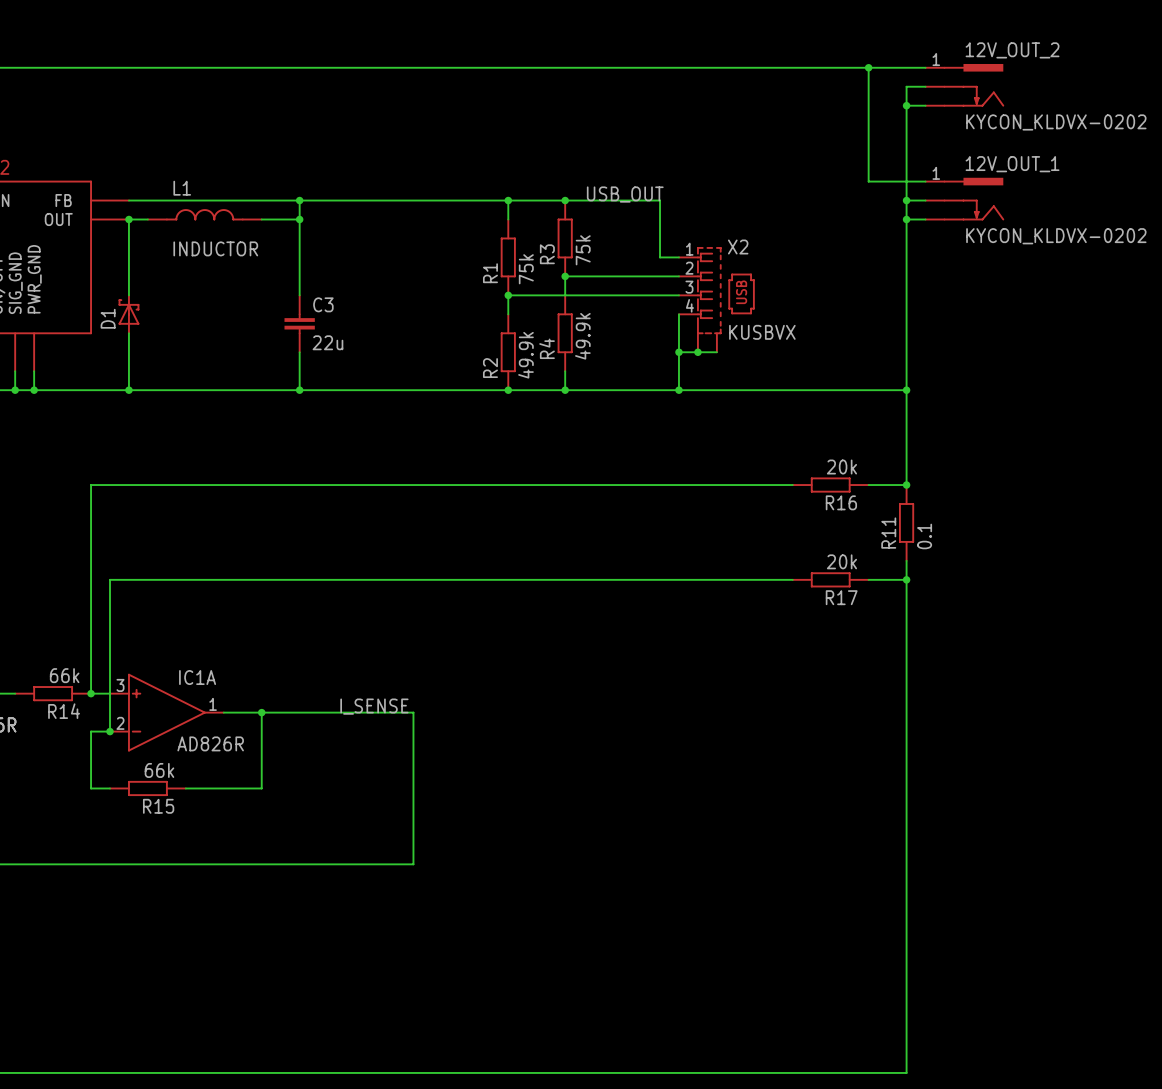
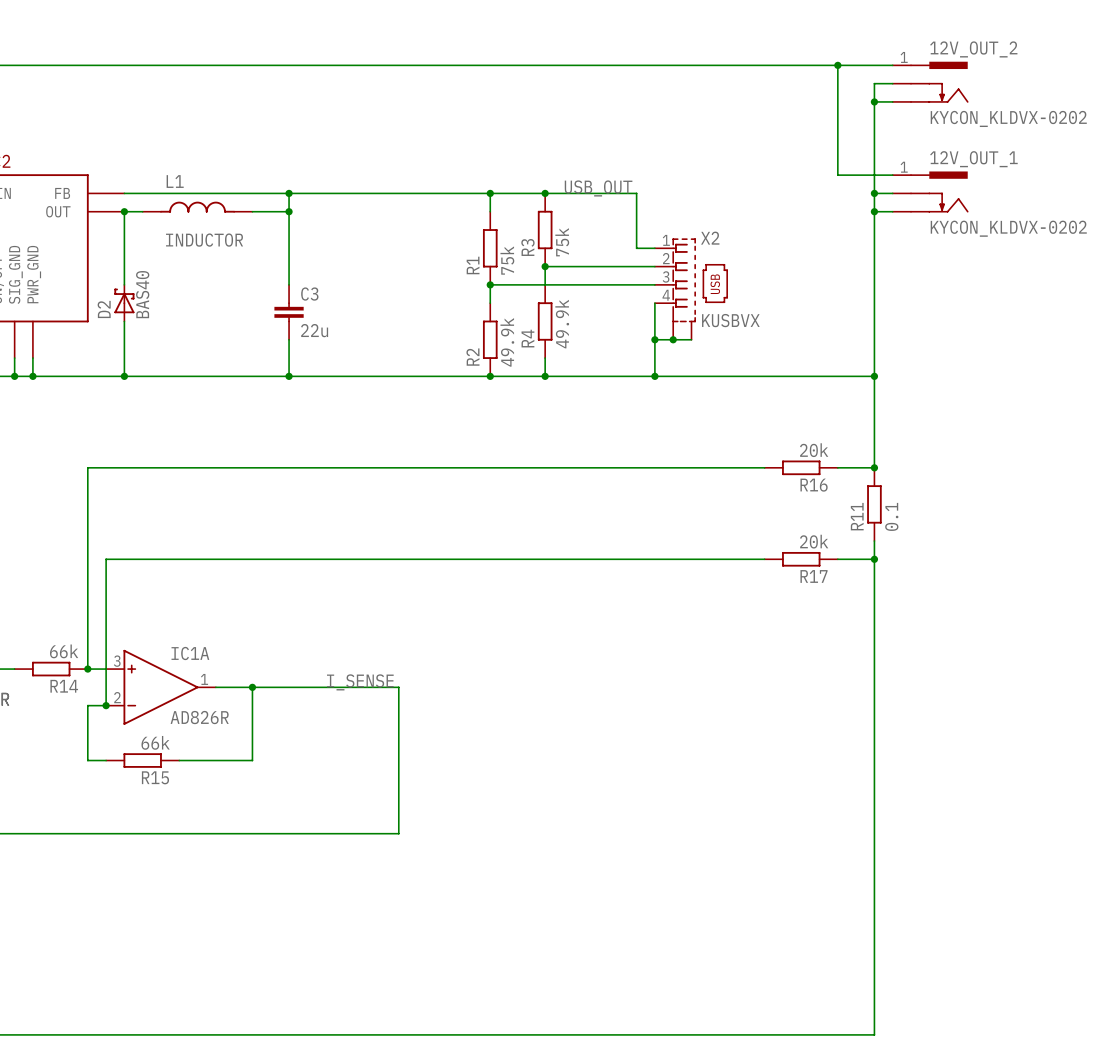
D1 value: none -> BAS40 (142, 294)
D1 name: D1 (108, 318) -> D2 (104, 309)

